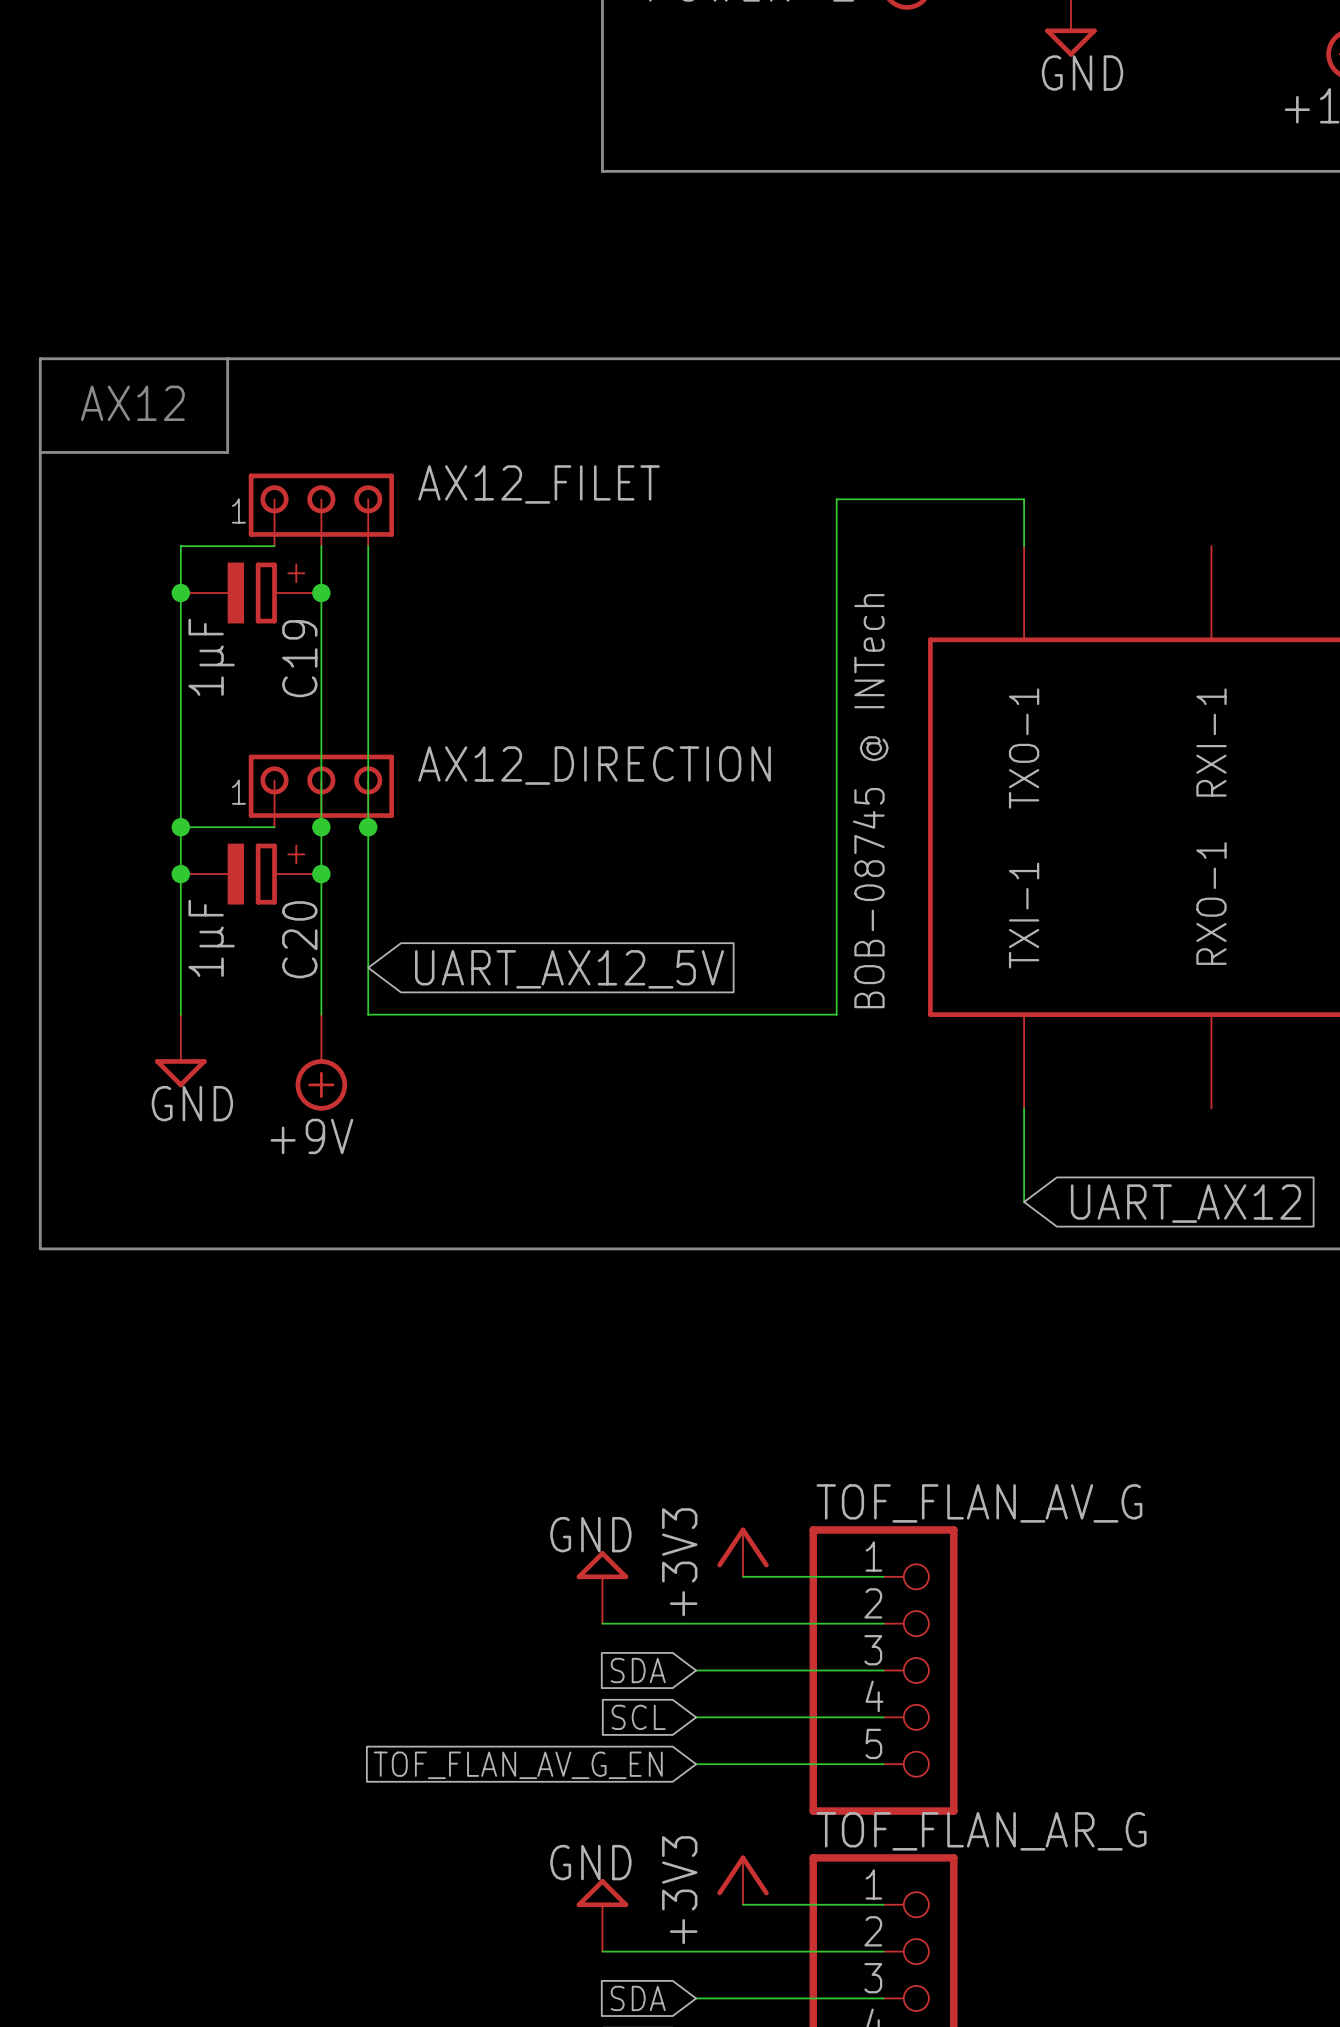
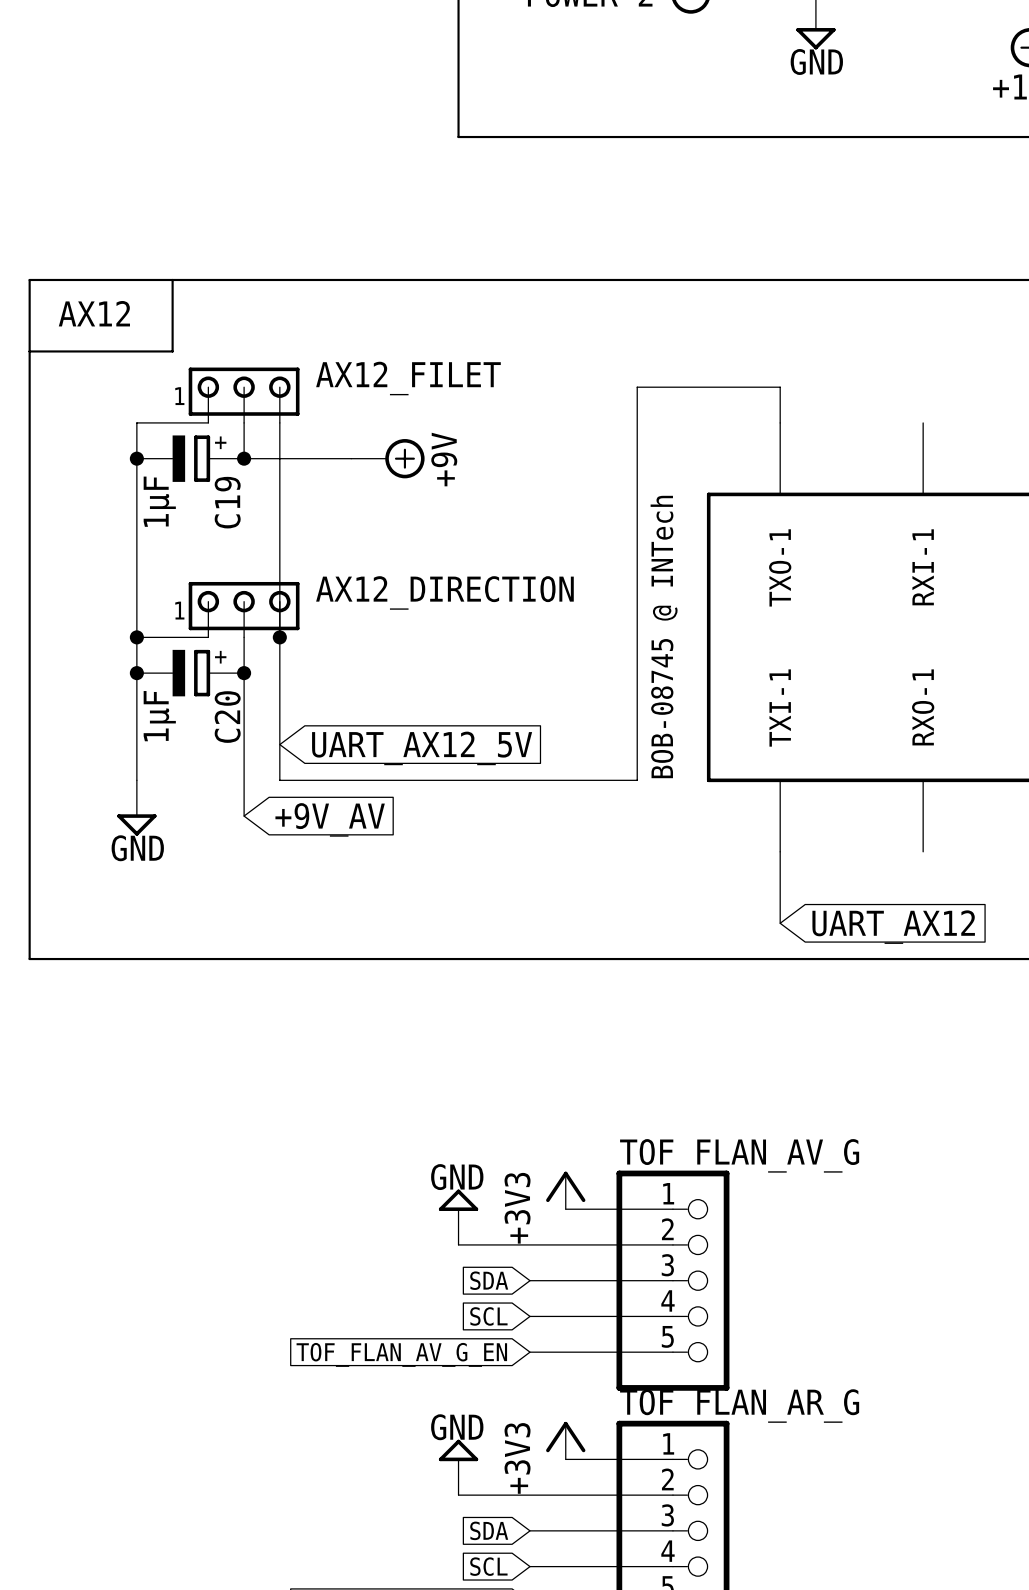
wire: (321, 593) (321, 827) -> (244, 458) (351, 458)
power symbol: none -> +9V (387, 458)
junction: (321, 827) -> none
power symbol: +9V (321, 1062) -> none
global label: none -> +9V_AV (330, 819)

